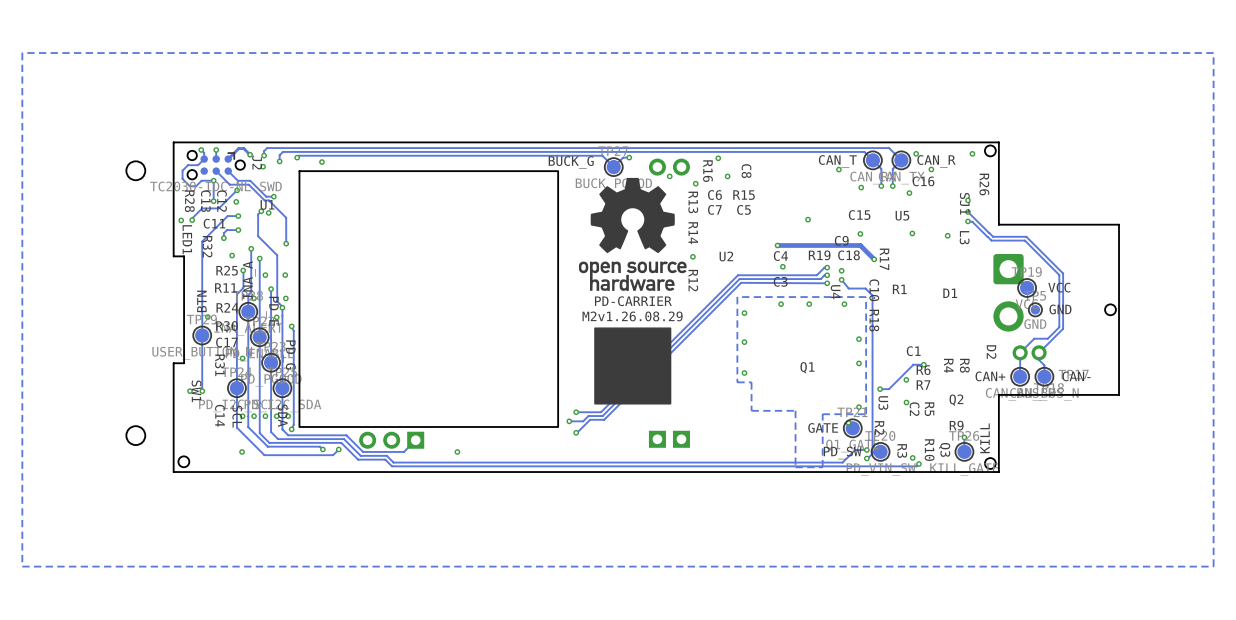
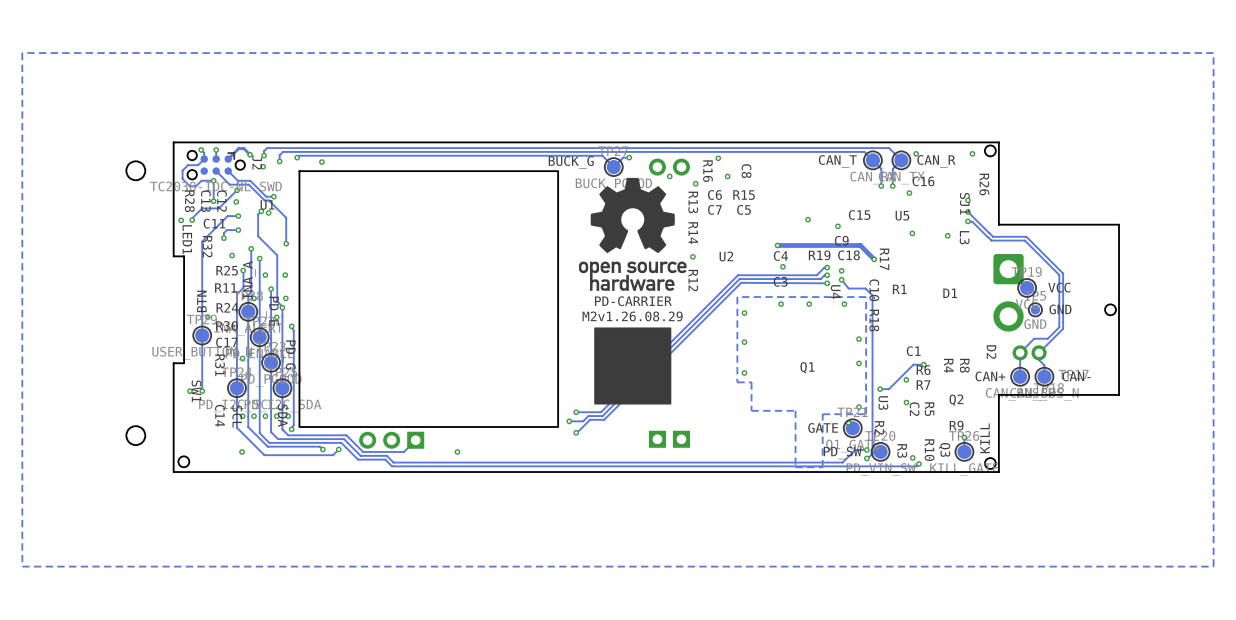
via: (838, 169) -> none
via: (931, 169) -> none
via: (861, 187) -> none
via: none -> (837, 226)
via: (860, 233) -> none

